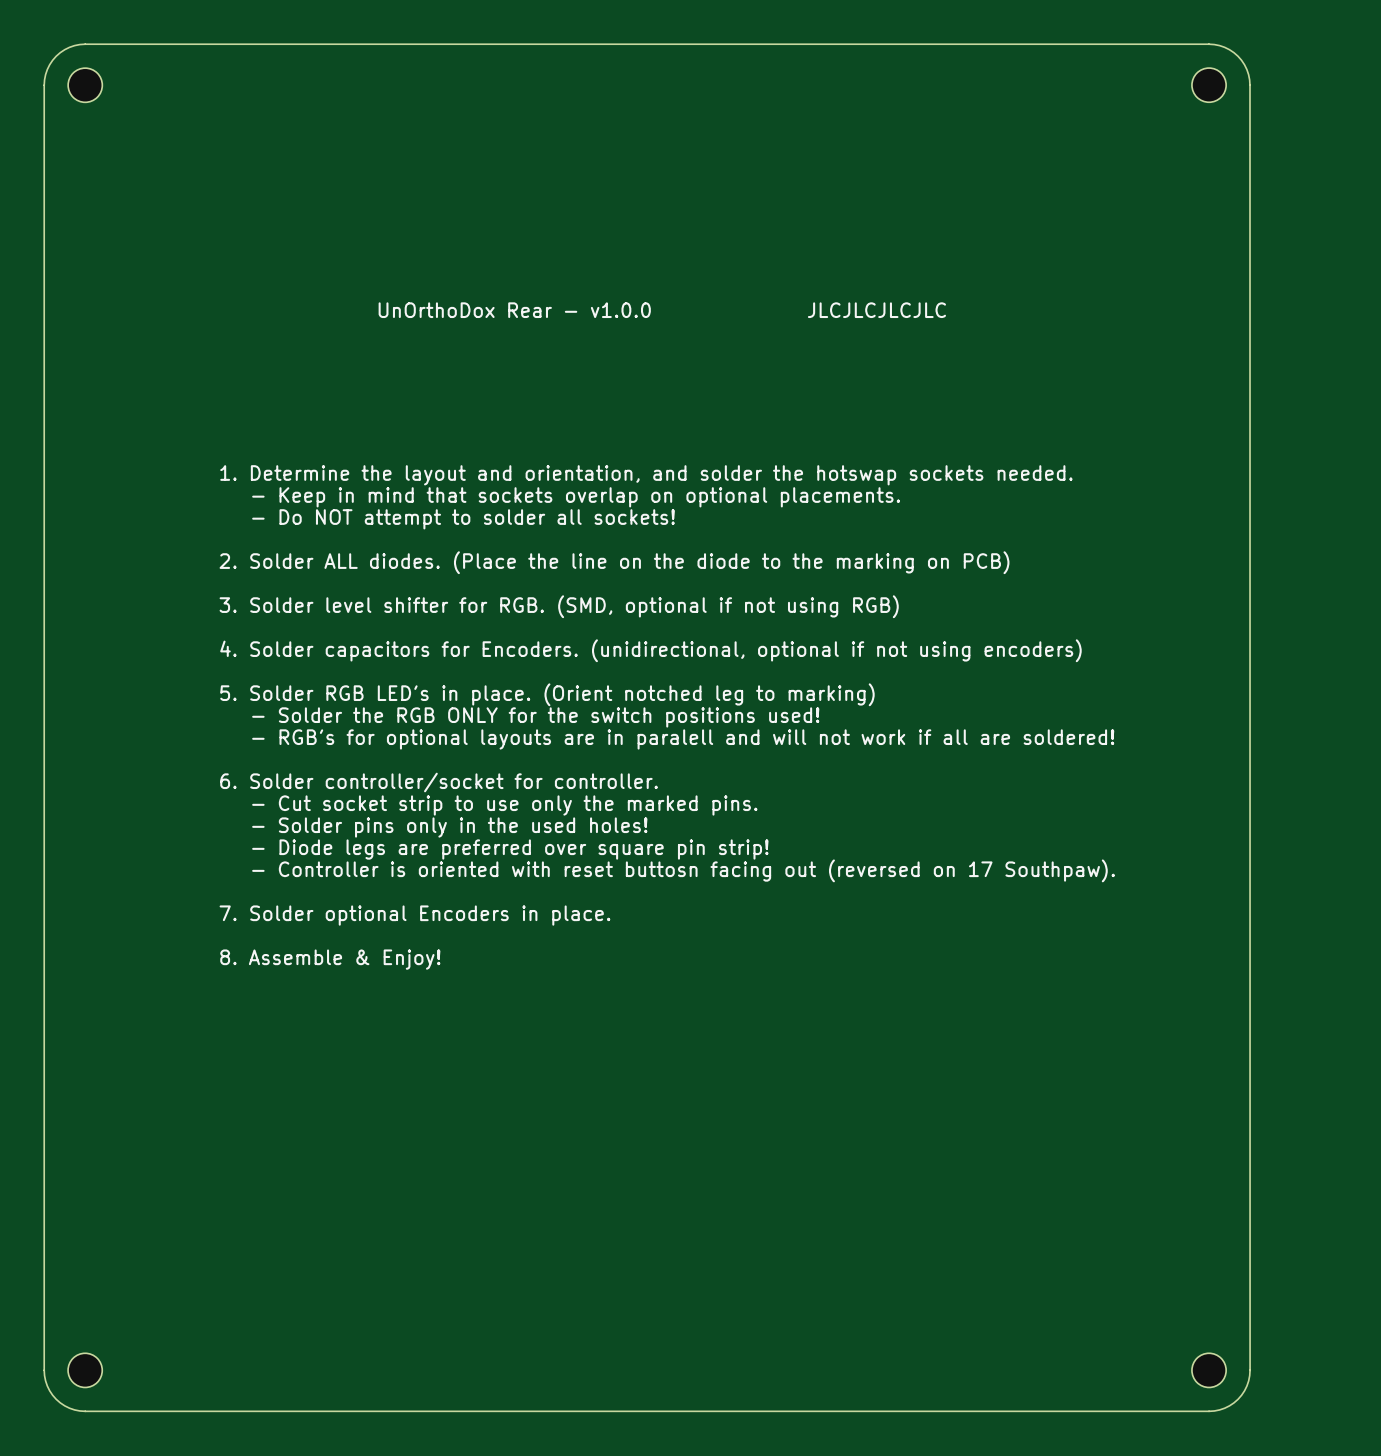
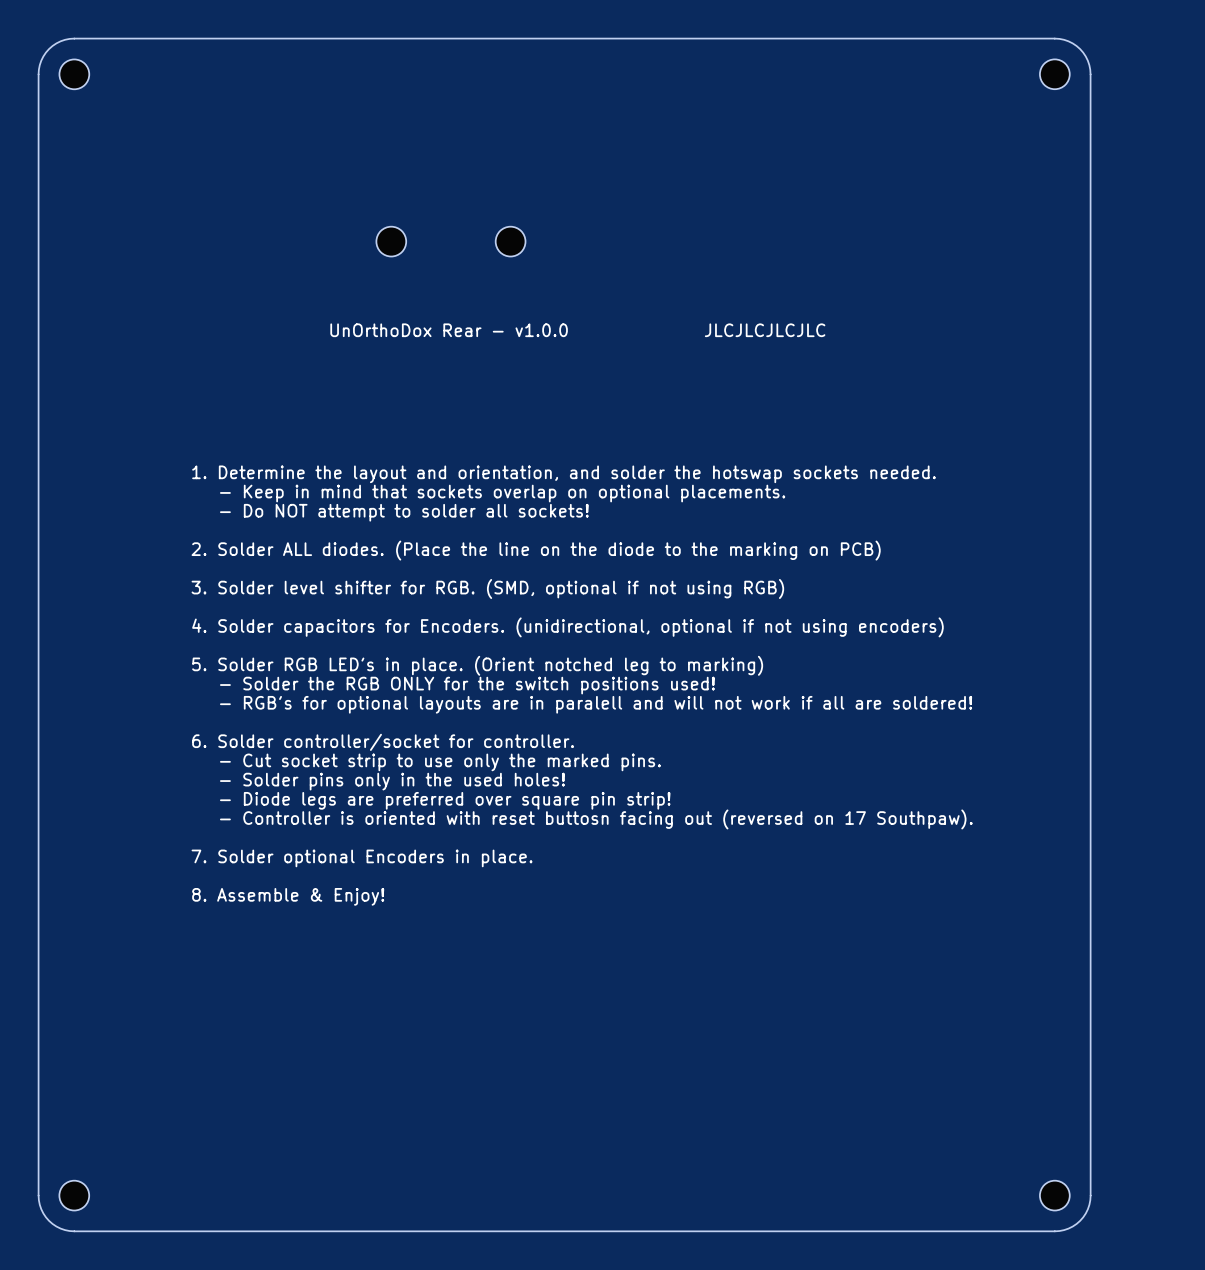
part: none -> (391, 241)
part: none -> (510, 241)
text position: UnOrthoDox Rear - v1.0.0 (514, 310) -> UnOrthoDox Rear - v1.0.0 (449, 330)
text position: JLCJLCJLCJLC (876, 310) -> JLCJLCJLCJLC (765, 330)
text position: 1. Determine the layout and orientation, and solder the hotswap sockets needed. (646, 475) -> 1. Determine the layout and orientation, and solder the hotswap sockets needed. (563, 474)
text position: - Keep in mind that sockets overlap on optional placements. (576, 497) -> - Keep in mind that sockets overlap on optional placements. (502, 493)
text position: - Do NOT attempt to solder all sockets! (463, 519) -> - Do NOT attempt to solder all sockets! (404, 512)
text position: 2. Solder ALL diodes. (Place the line on the diode to the marking on PCB) (614, 562) -> 2. Solder ALL diodes. (Place the line on the diode to the marking on PCB) (536, 550)
text position: 3. Solder level shifter for RGB. (SMD, optional if not using RGB) (559, 606) -> 3. Solder level shifter for RGB. (SMD, optional if not using RGB) (487, 588)
text position: 4. Solder capacitors for Encoders. (unidirectional, optional if not using encoders) (650, 650) -> 4. Solder capacitors for Encoders. (unidirectional, optional if not using encoders) (567, 627)
text position: 5. Solder RGB LED's in place. (Orient notched leg to marking) (547, 694) -> 5. Solder RGB LED's in place. (Orient notched leg to marking) (477, 665)
text position: - Solder the RGB ONLY for the switch positions used! (535, 717) -> - Solder the RGB ONLY for the switch positions used! (467, 685)
text position: - RGB's for optional layouts are in paralell and will not work if all are soldered! (683, 739) -> - RGB's for optional layouts are in paralell and will not work if all are soldered! (596, 704)
text position: 6. Solder controller/socket for controller. (439, 782) -> 6. Solder controller/socket for controller. (383, 742)
text position: - Cut socket strip to use only the marked pins. (504, 805) -> - Cut socket strip to use only the marked pins. (440, 762)
text position: - Solder pins only in the used holes! (449, 827) -> - Solder pins only in the used holes! (392, 781)
text position: - Diode legs are preferred over square pin strip! (510, 849) -> - Diode legs are preferred over square pin strip! (445, 800)
text position: - Controller is oriented with reset buttosn facing out (reversed on 17 Southpaw). (683, 870) -> - Controller is oriented with reset buttosn facing out (reversed on 17 Southpaw). (596, 819)
text position: 7. Solder optional Encoders in place. (414, 915) -> 7. Solder optional Encoders in place. (362, 858)
text position: 8. Assemble & Enjoy! (330, 959) -> 8. Assemble & Enjoy! (288, 896)

